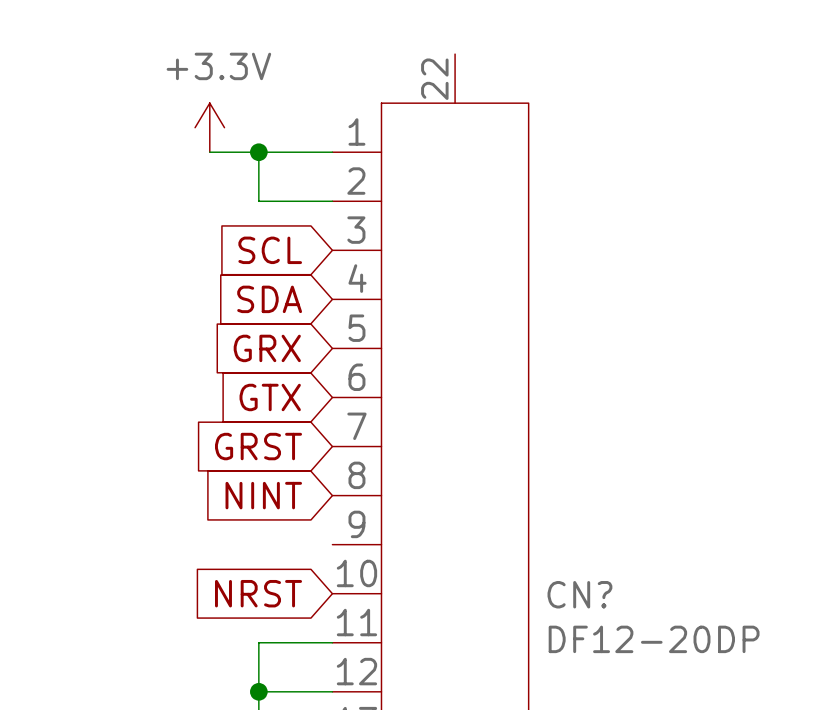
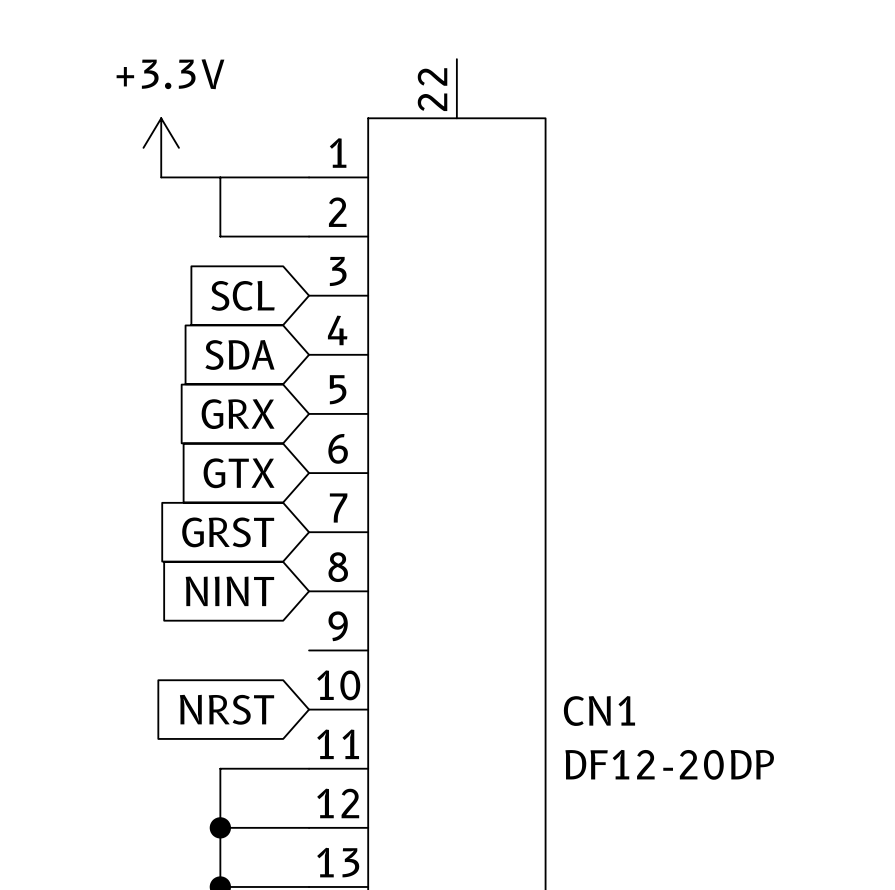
junction: (258, 152) -> none
CN? name: CN? (579, 594) -> CN1 (599, 711)

